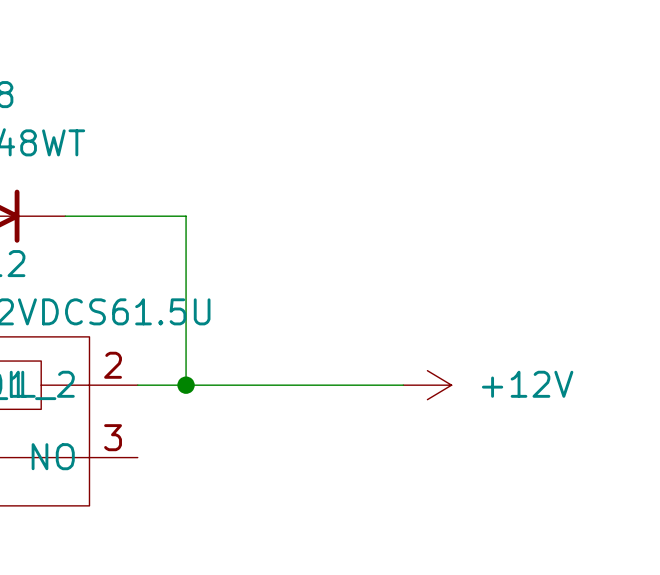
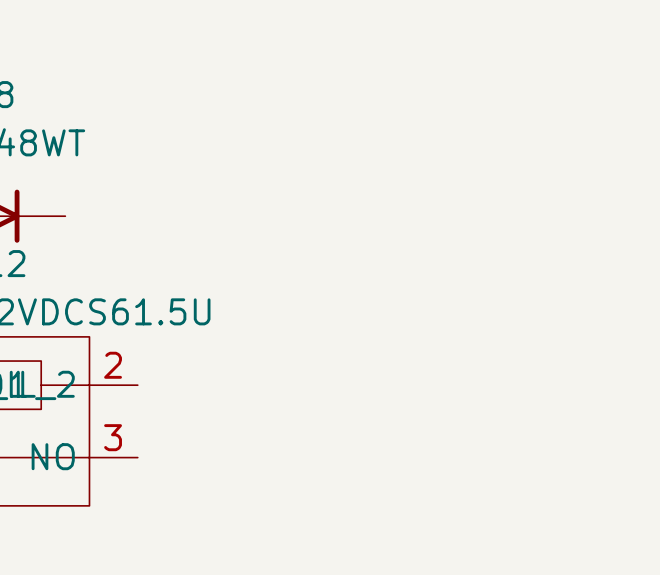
wire: (65, 216) (186, 216) (186, 385) -> none
wire: (137, 385) (403, 385) -> none
junction: (186, 385) -> none
power symbol: +12V (427, 385) -> none

